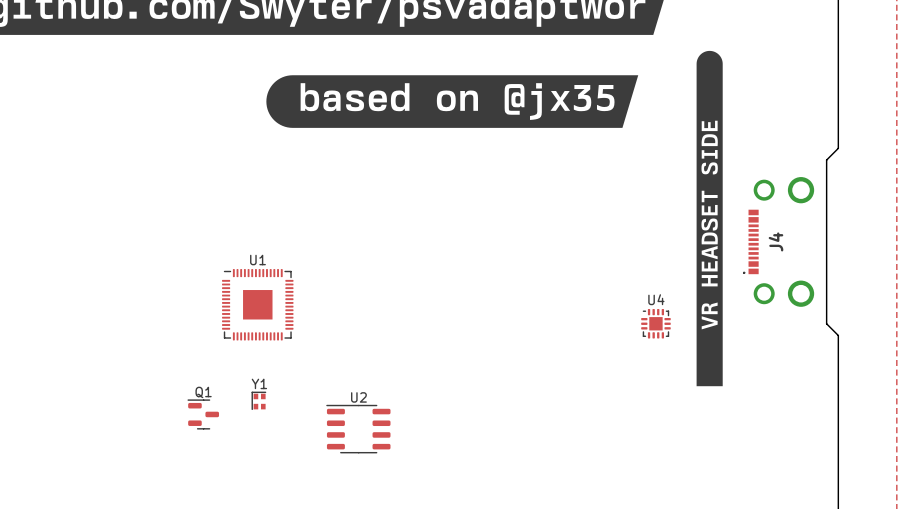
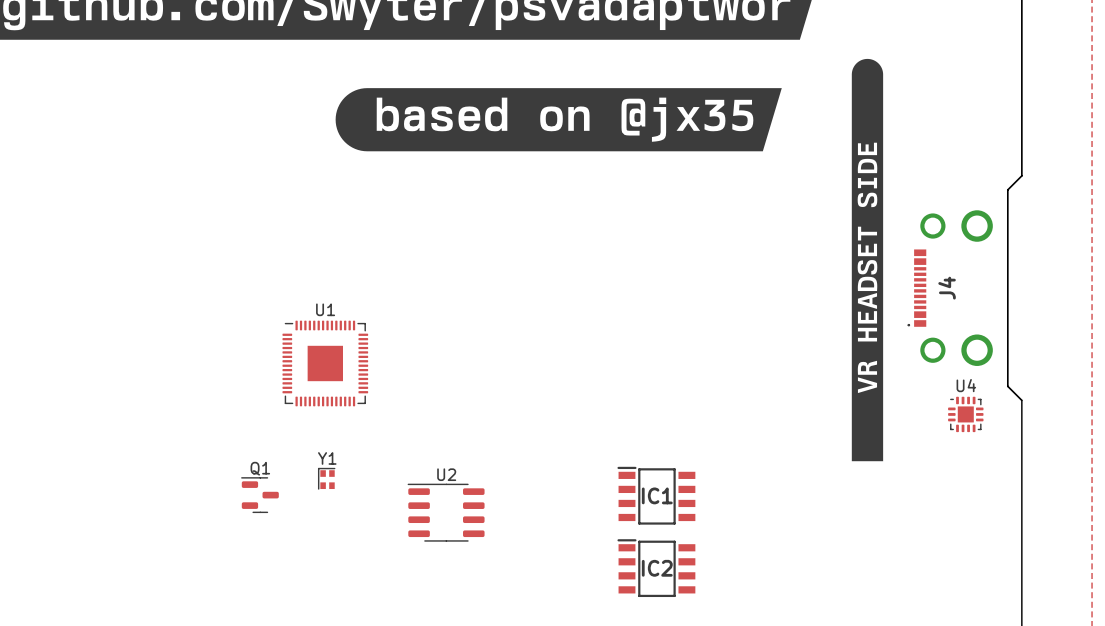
U4 position: (655, 323) -> (965, 414)
IC1: none -> (656, 495)
IC2: none -> (656, 568)

